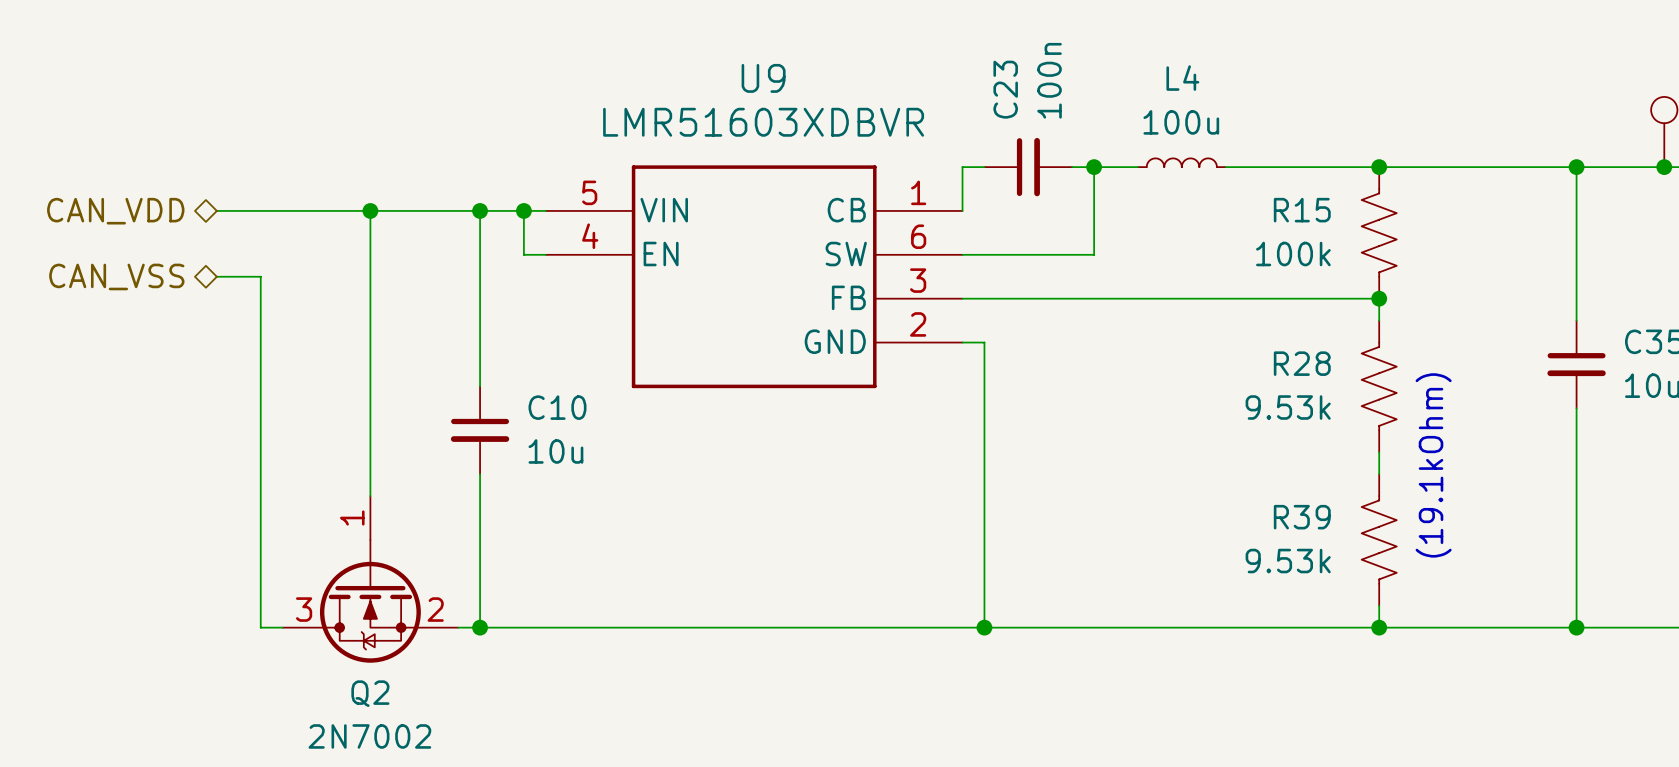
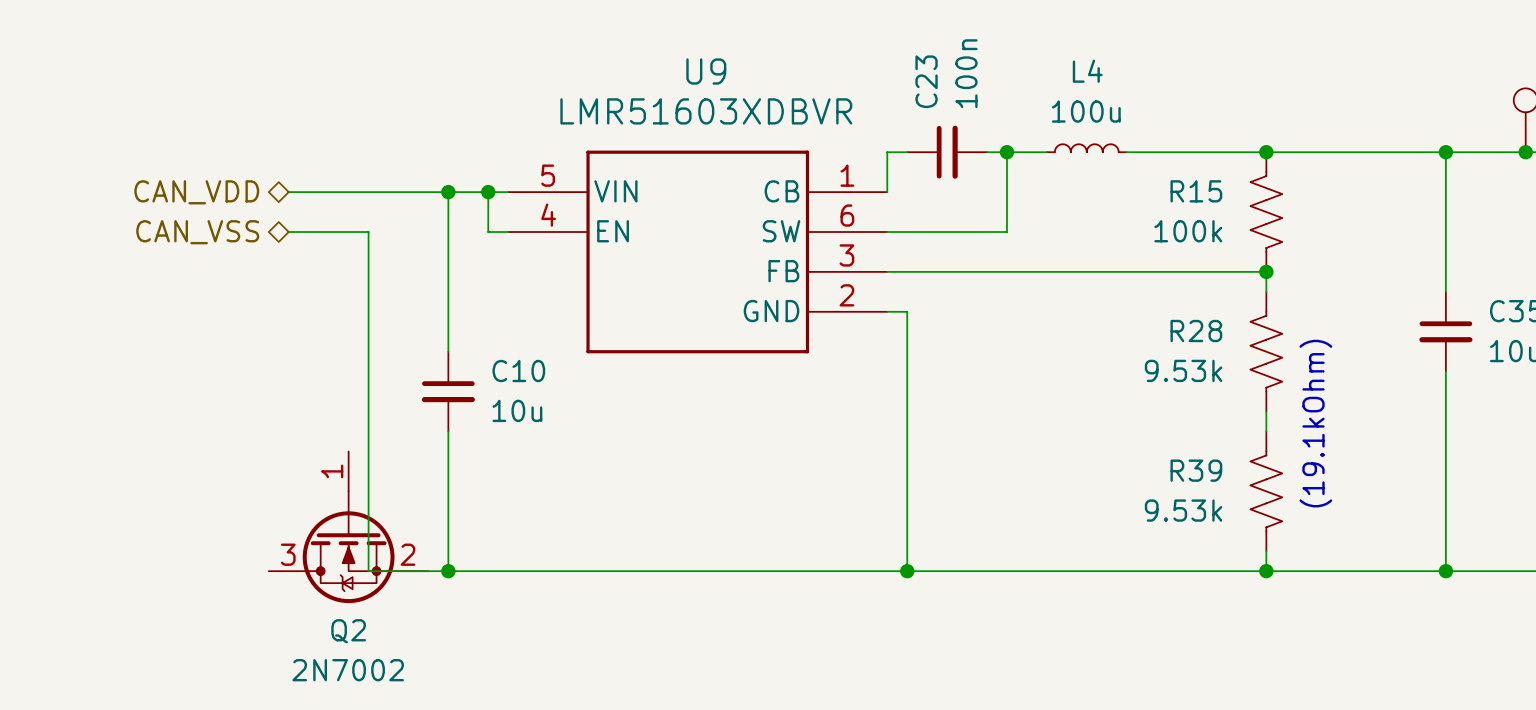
wire: (216, 210) (304, 210) -> none
wire: (370, 210) (370, 496) -> none
junction: (370, 210) -> none
hierarchical label position: CAN_VDD (115, 211) -> CAN_VDD (196, 192)
wire: none -> (288, 232) (368, 232) (368, 571) (428, 571)
hierarchical label position: CAN_VSS (116, 276) -> CAN_VSS (197, 232)
wire: (216, 276) (260, 276) (260, 627) (282, 627) -> none

